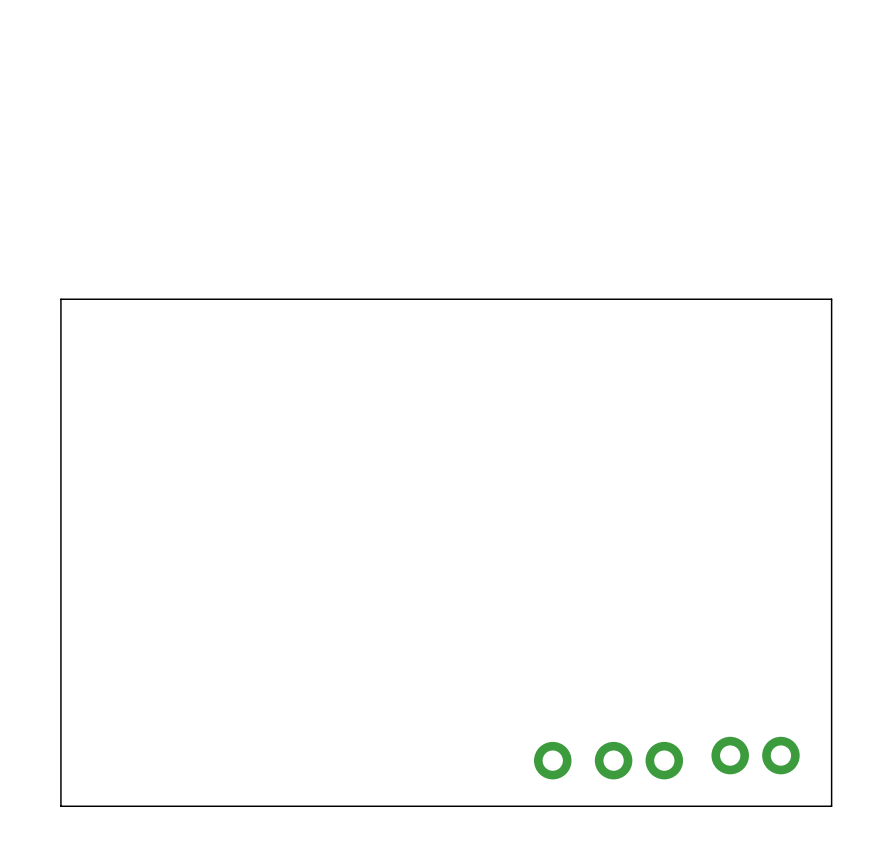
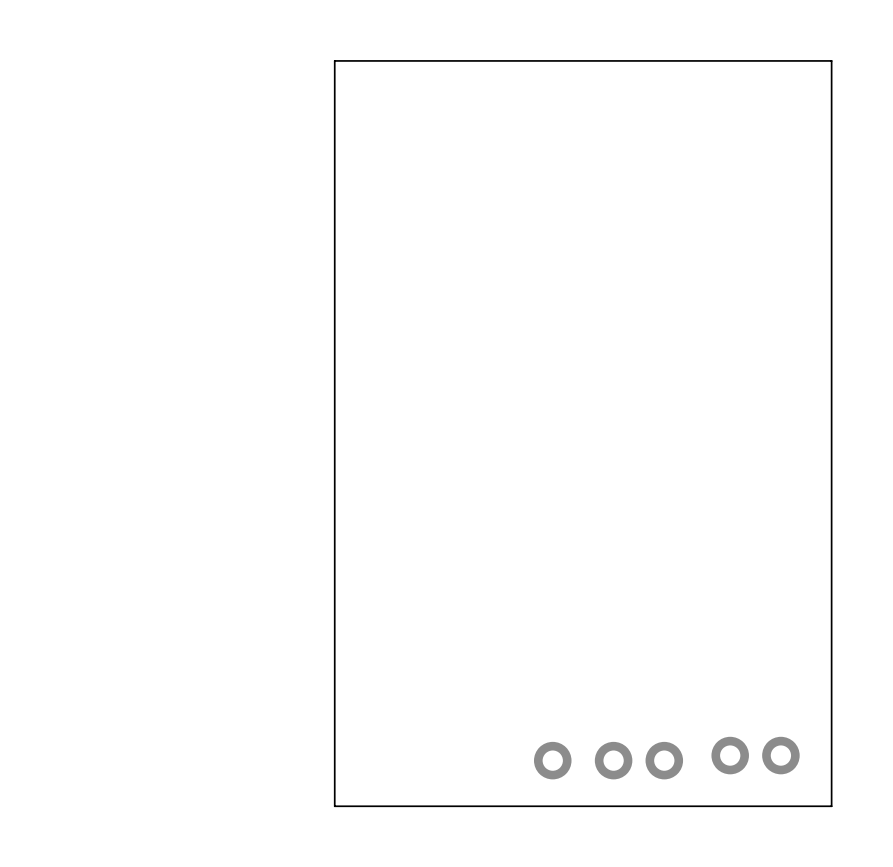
board edge: (831, 299) (60, 299) (60, 806) (334, 806) -> (831, 299) (831, 60) (334, 60) (334, 806)

